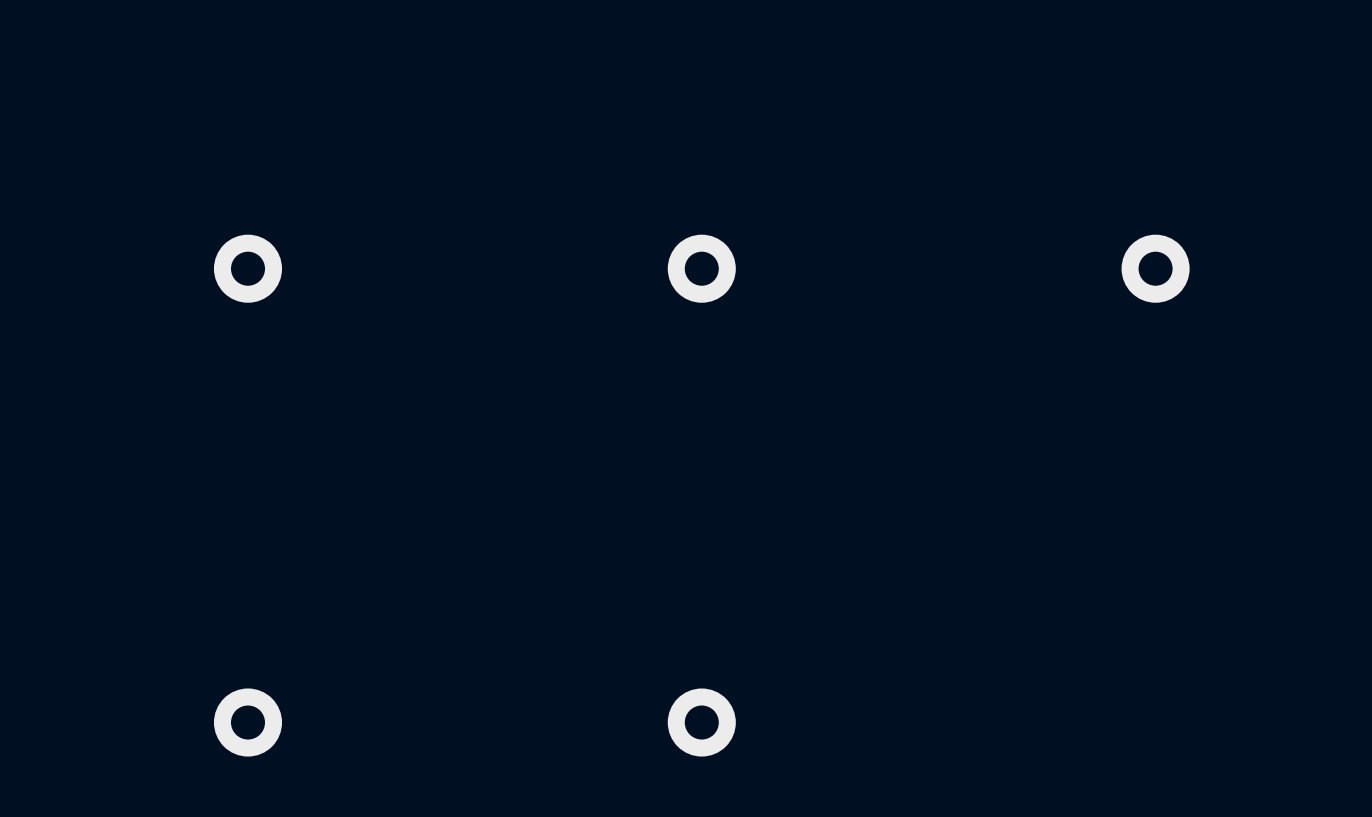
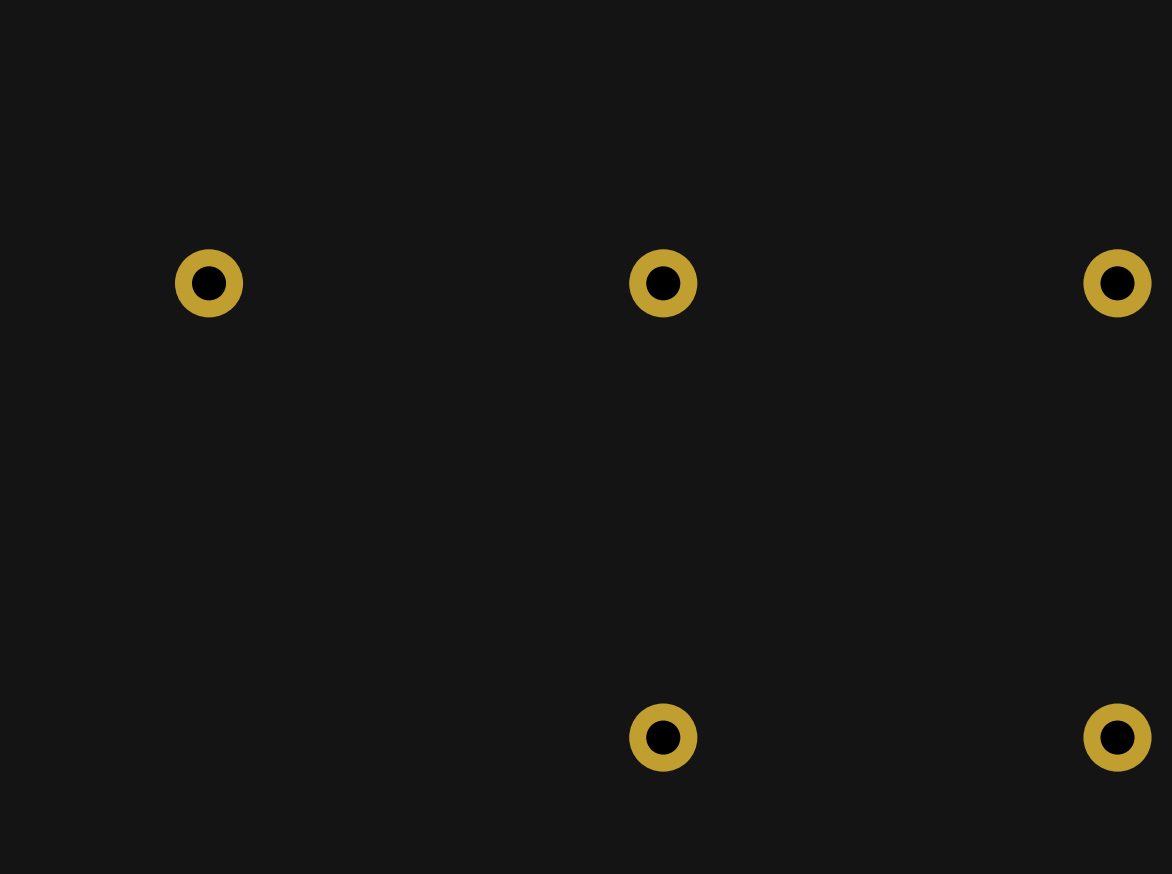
via: (247, 722) -> none
via: none -> (1117, 737)

